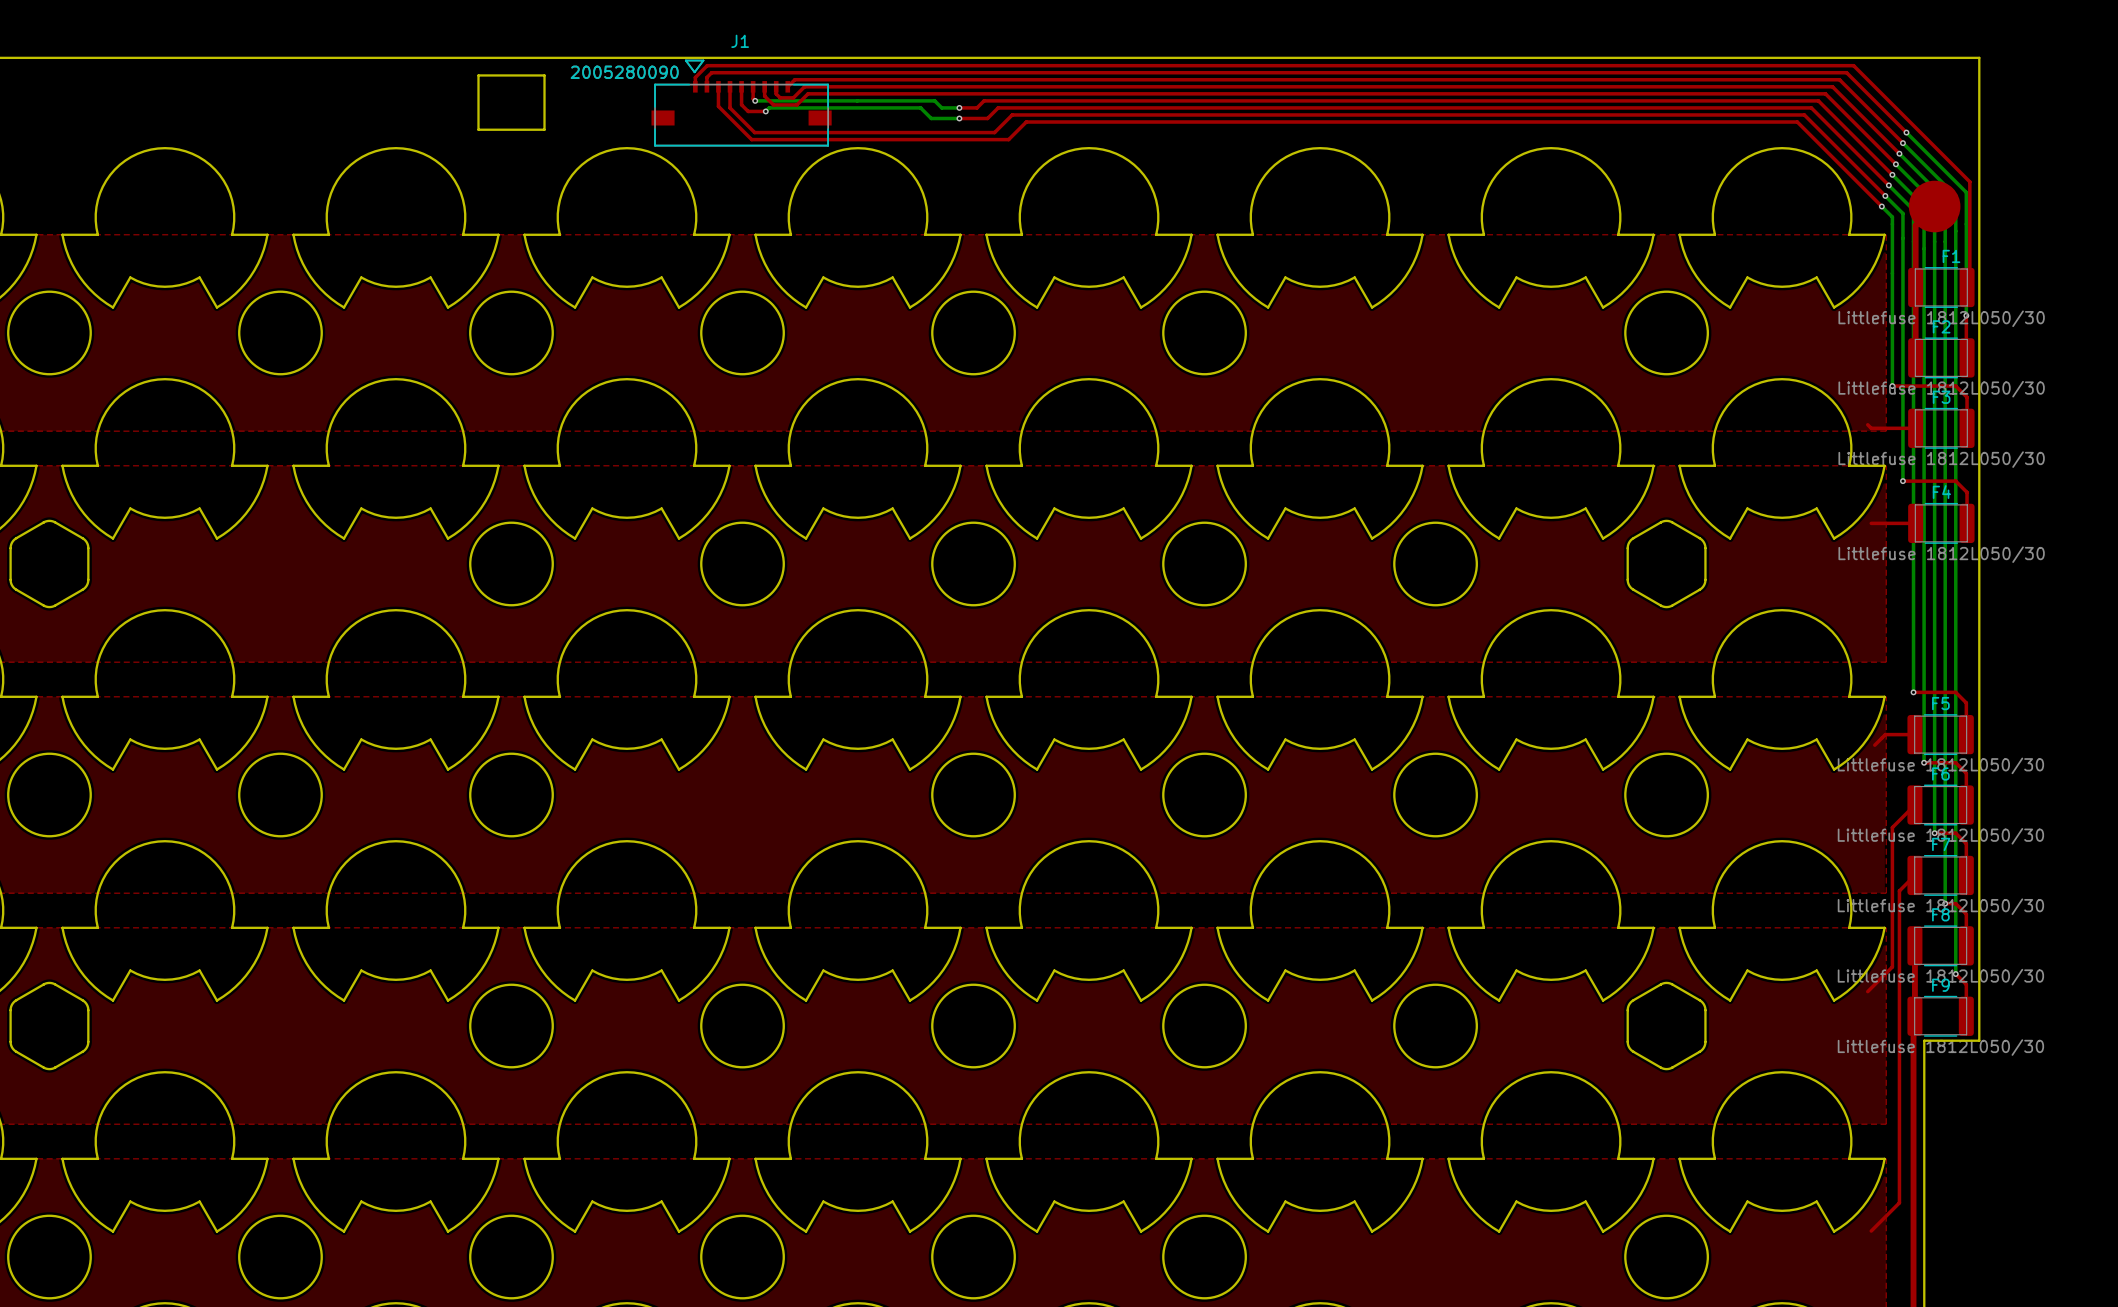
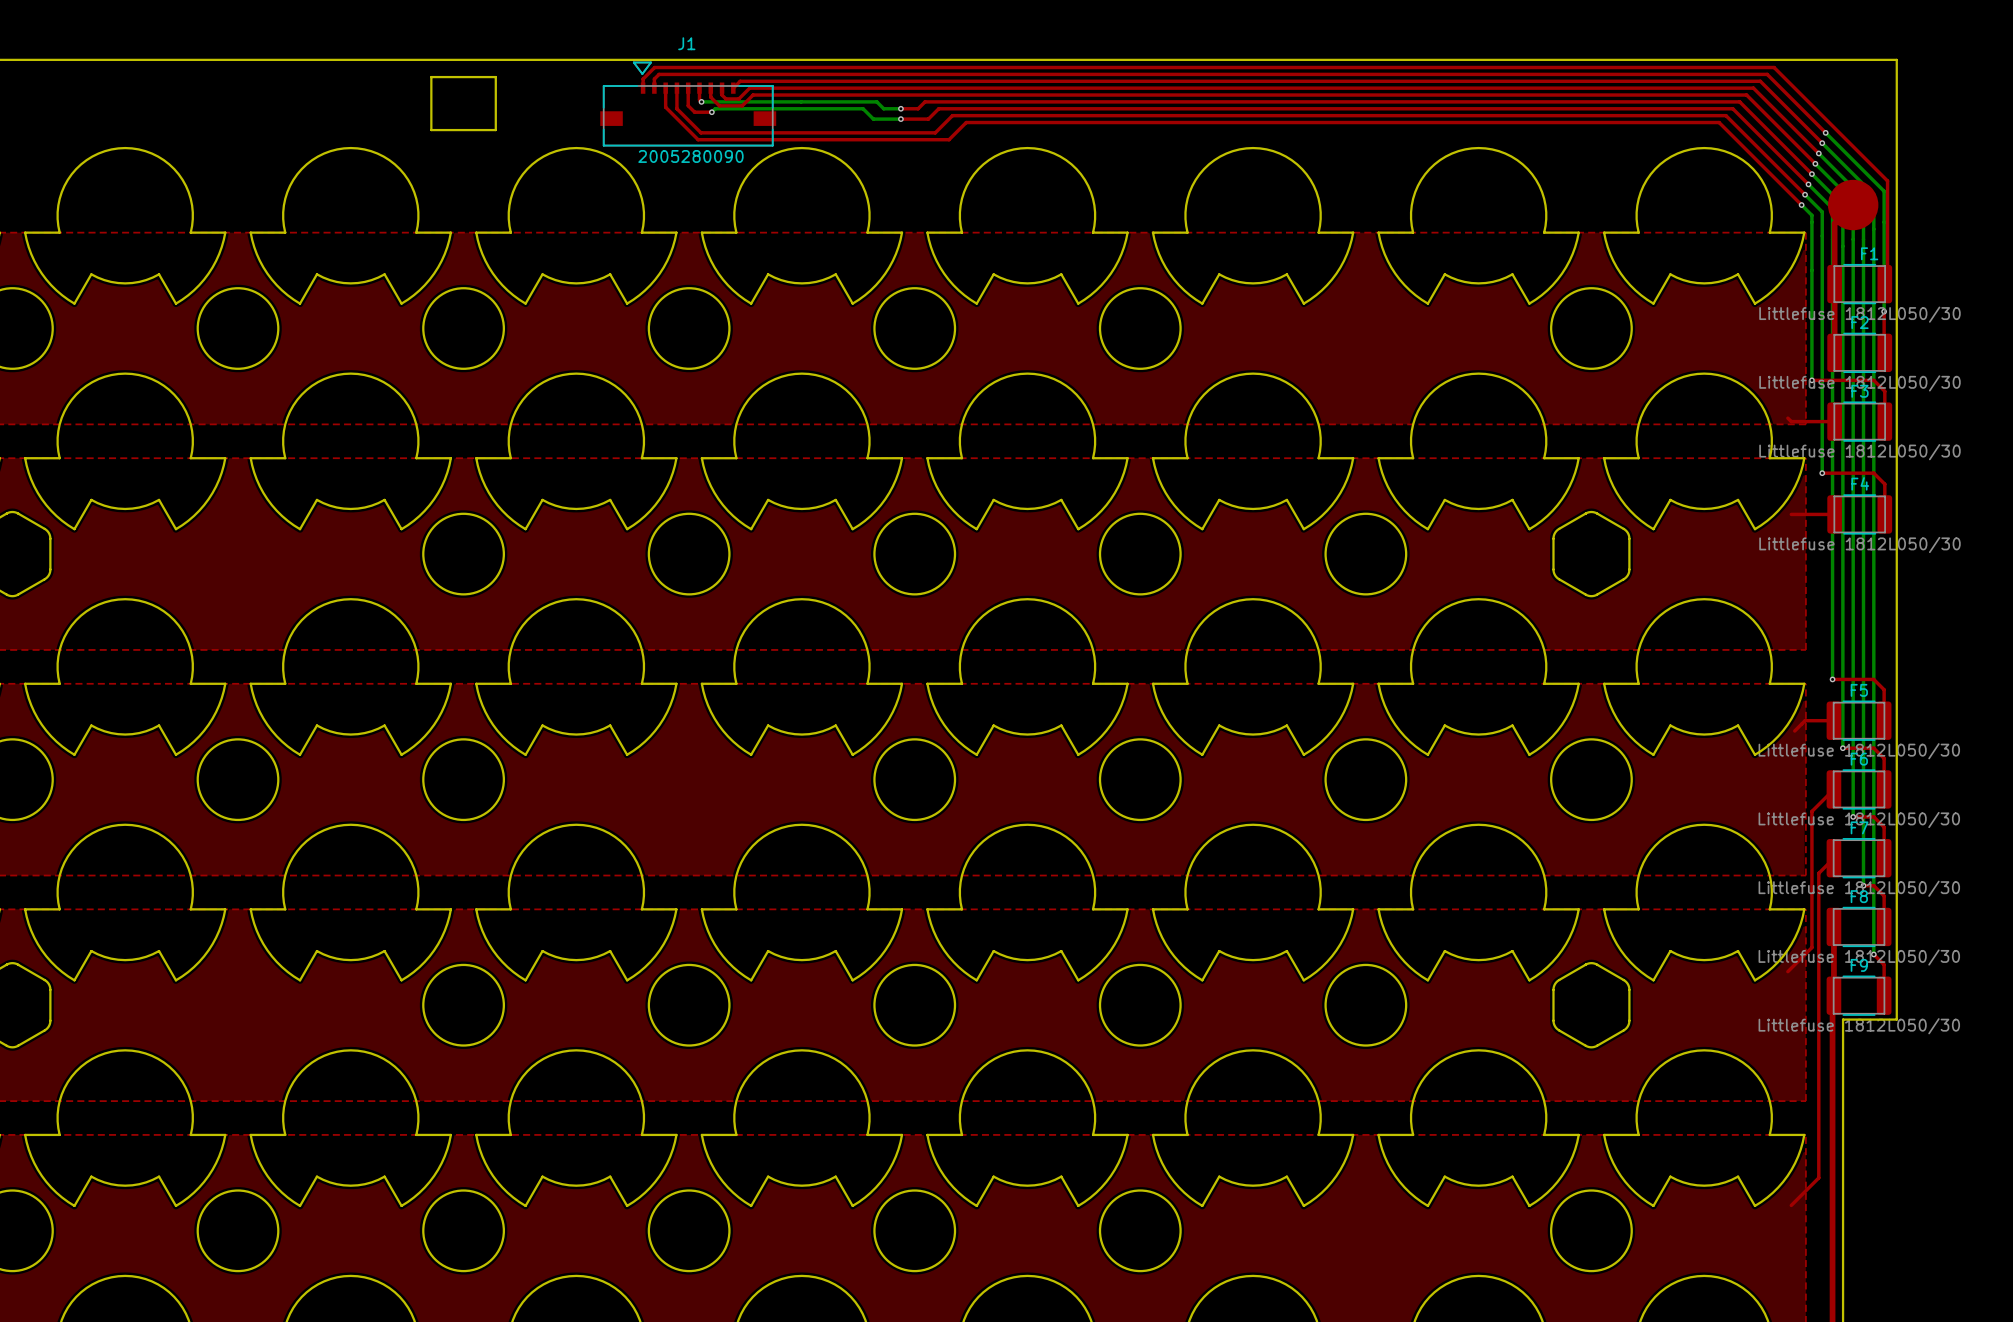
J1 footprint: [651, 59, 832, 147] -> [600, 61, 777, 147]
text: none -> 2005280090 (690, 156)

